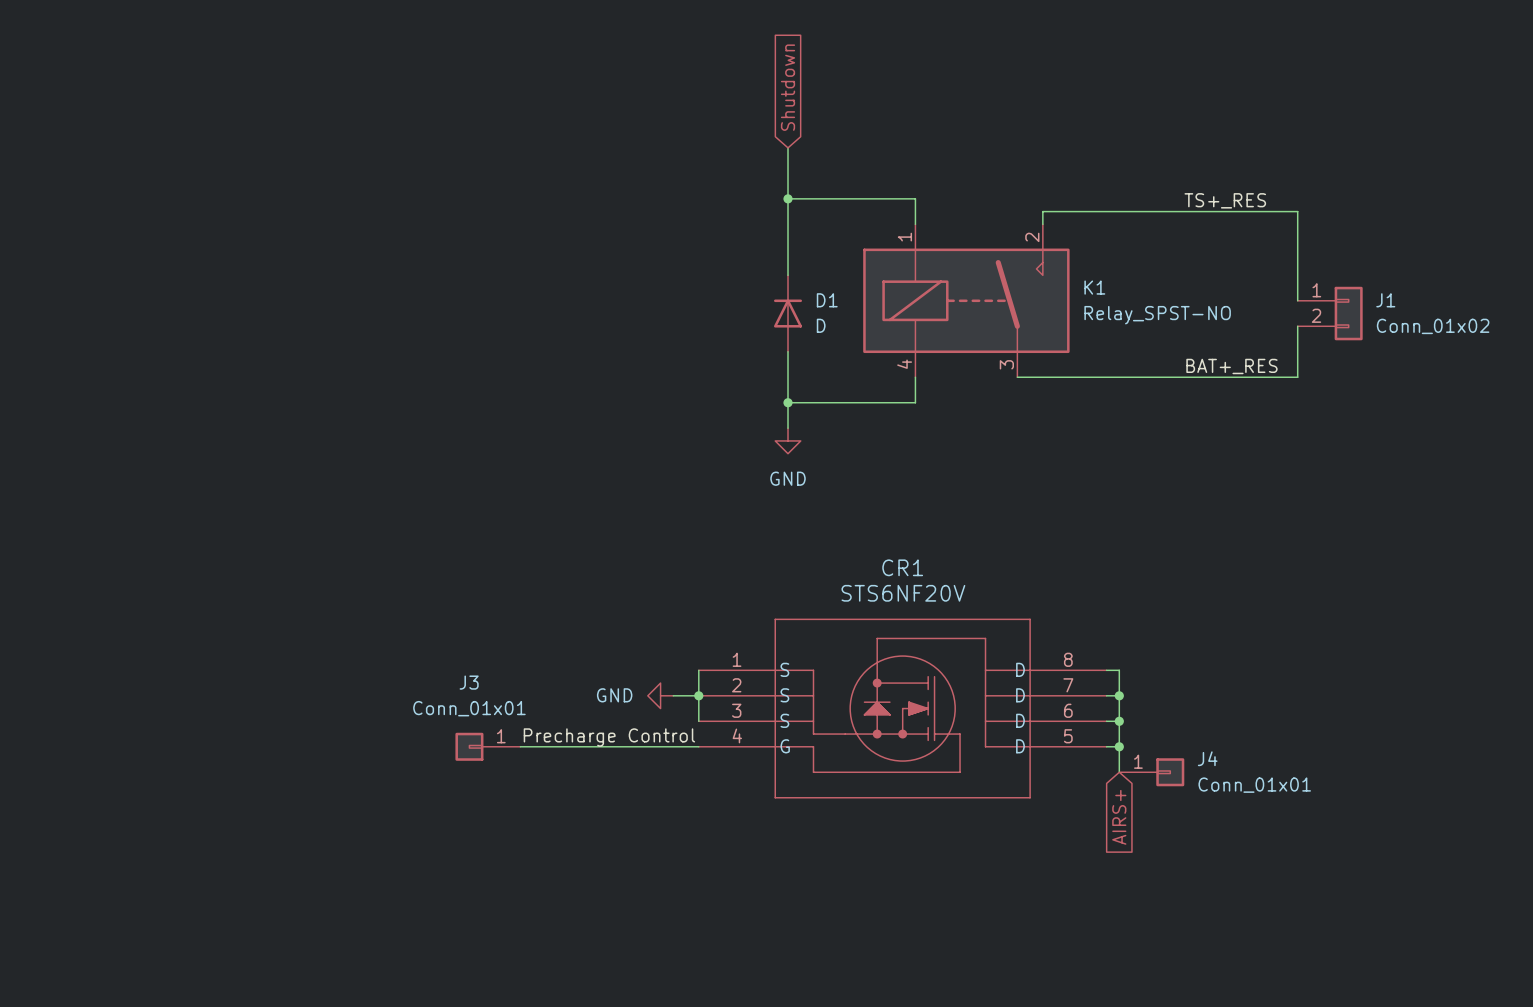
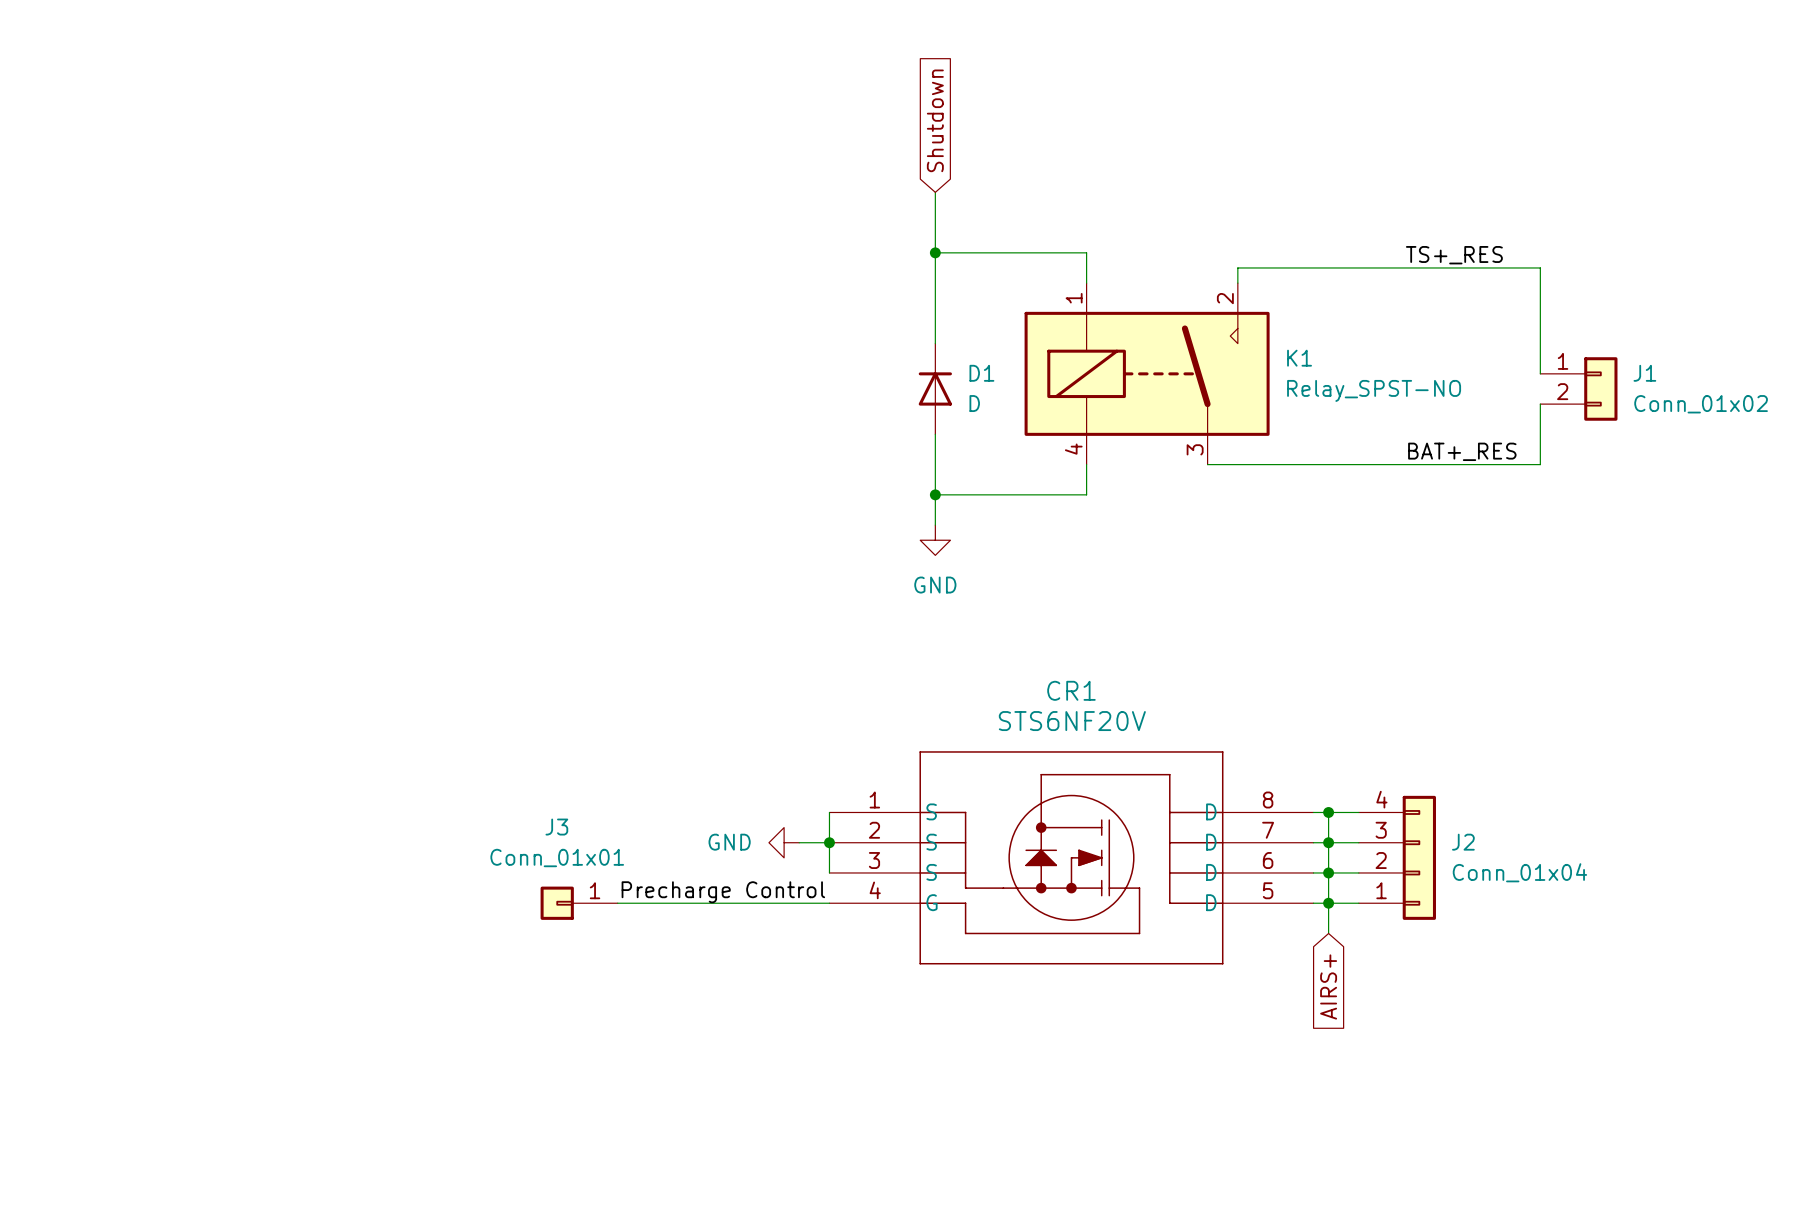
wire: none -> (1328, 812) (1358, 812)
junction: none -> (1328, 812)
wire: none -> (1328, 842) (1358, 842)
J2: none -> Conn_01x04 (1397, 857)
wire: none -> (1328, 872) (1358, 872)
wire: none -> (1328, 903) (1358, 903)
J4: Conn_01x01 (1151, 772) -> none

